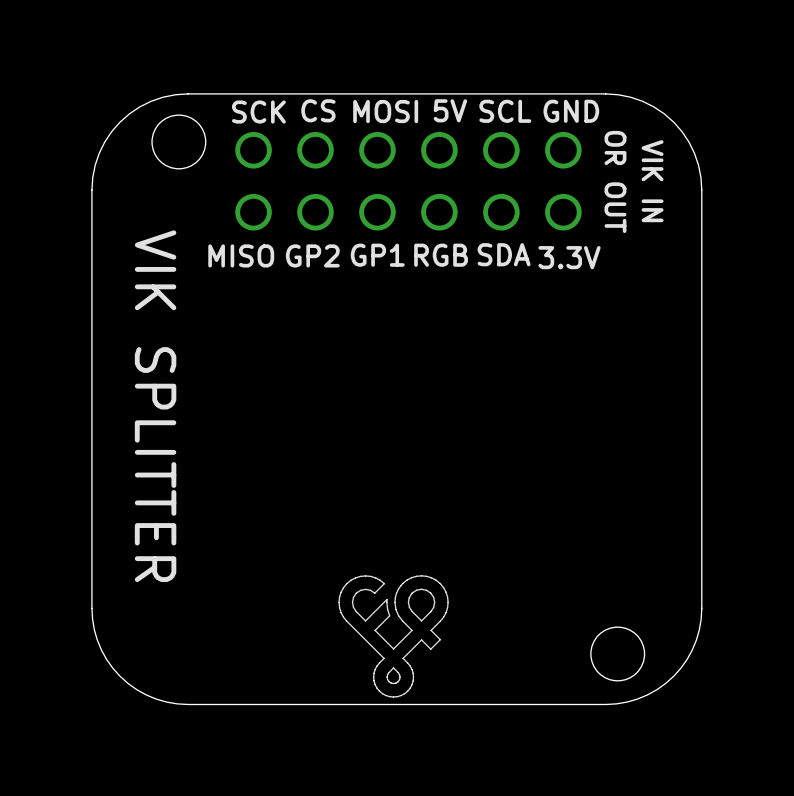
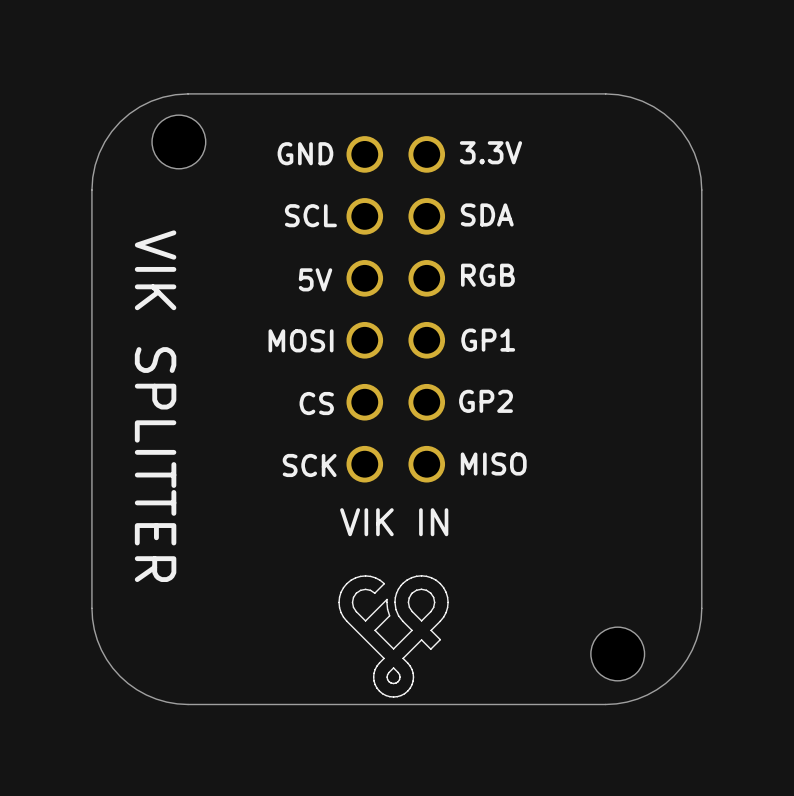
part: (408, 181) -> none
text: OR OUT (615, 181) -> none
part: none -> (395, 309)

